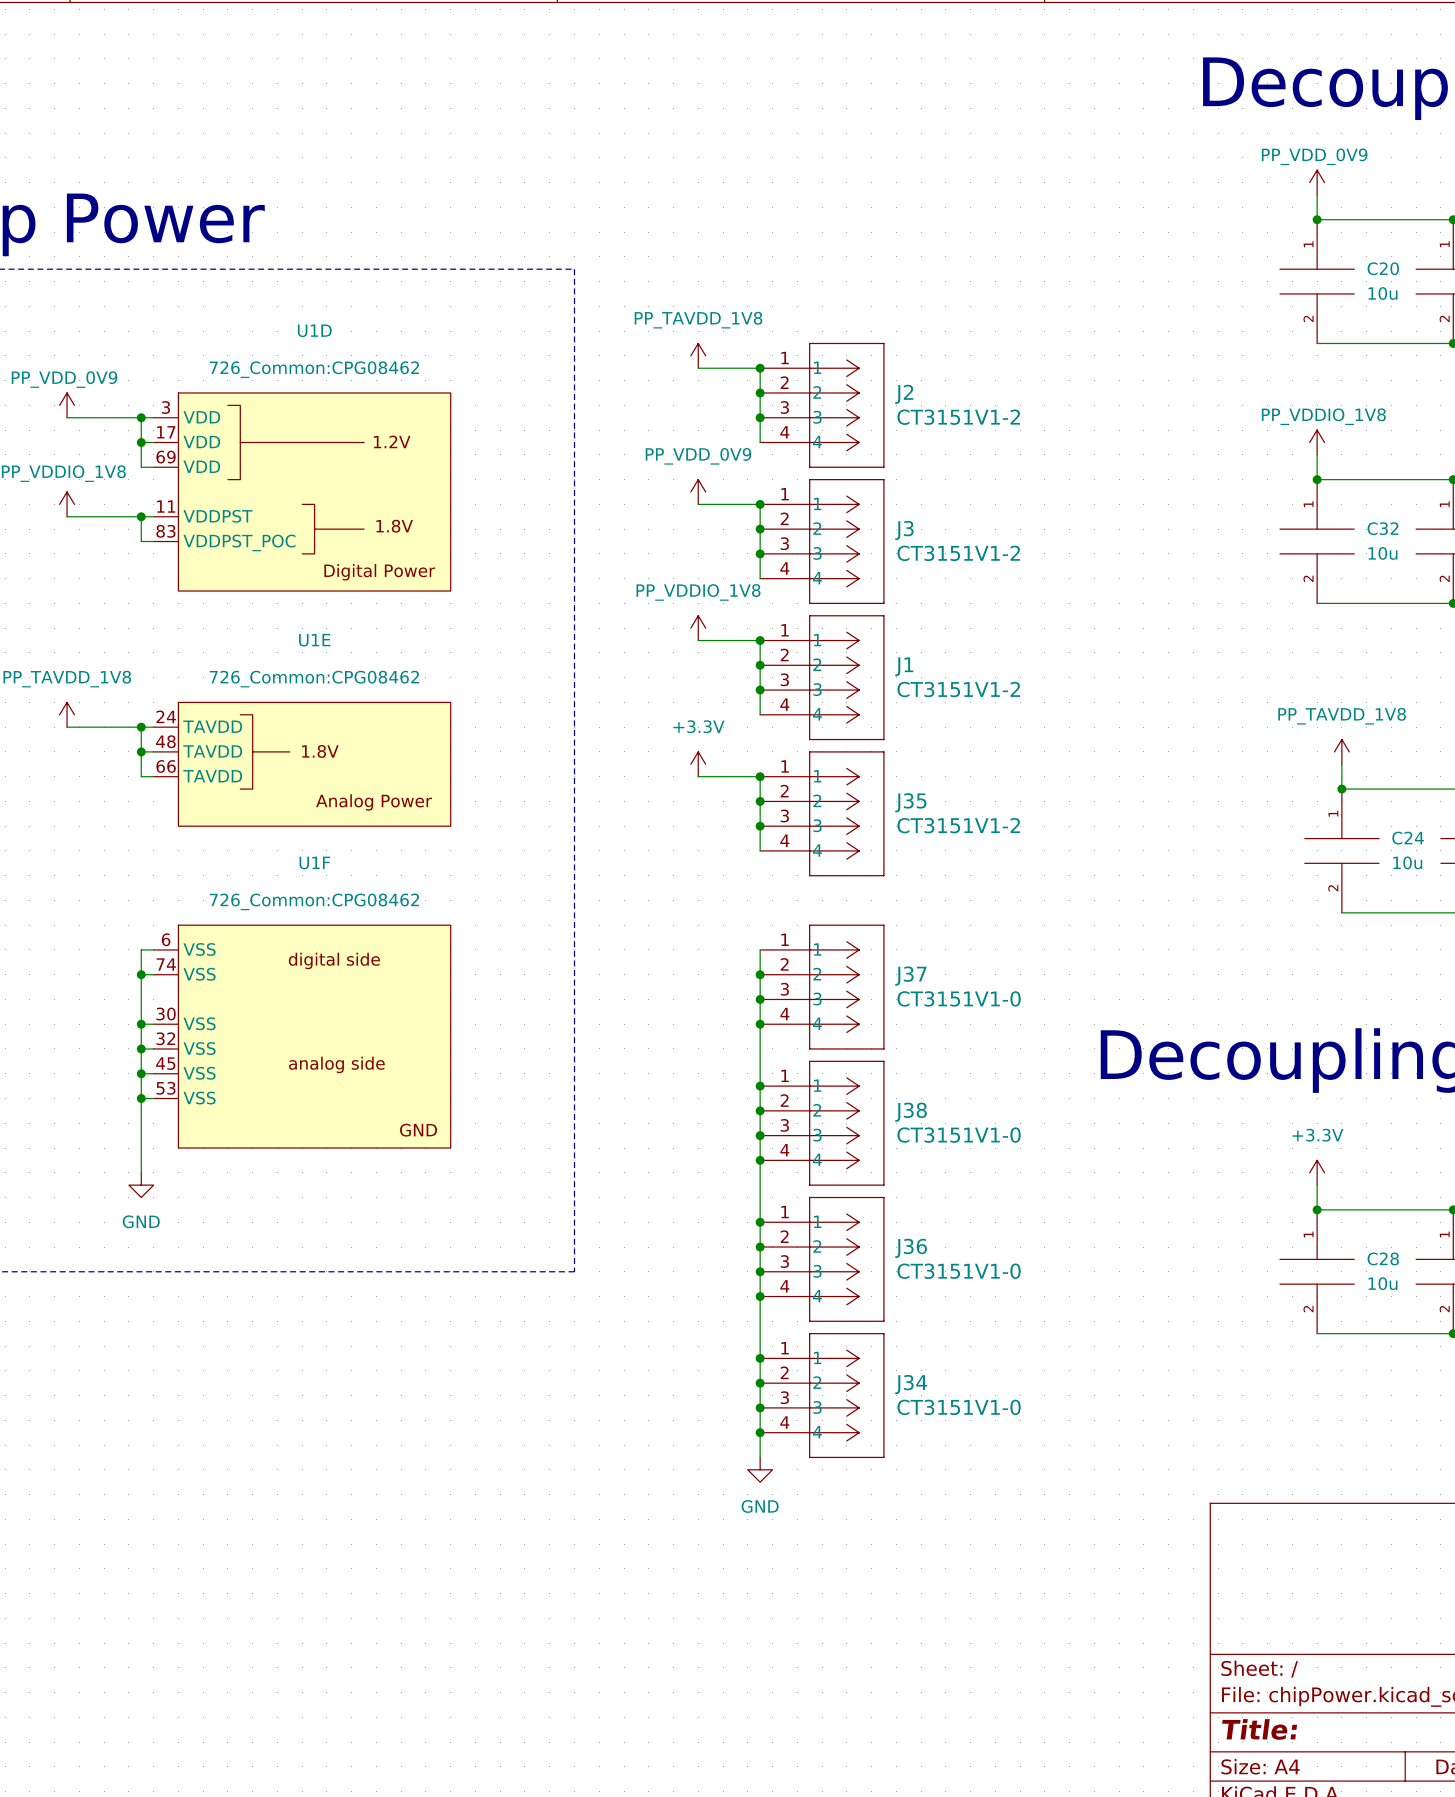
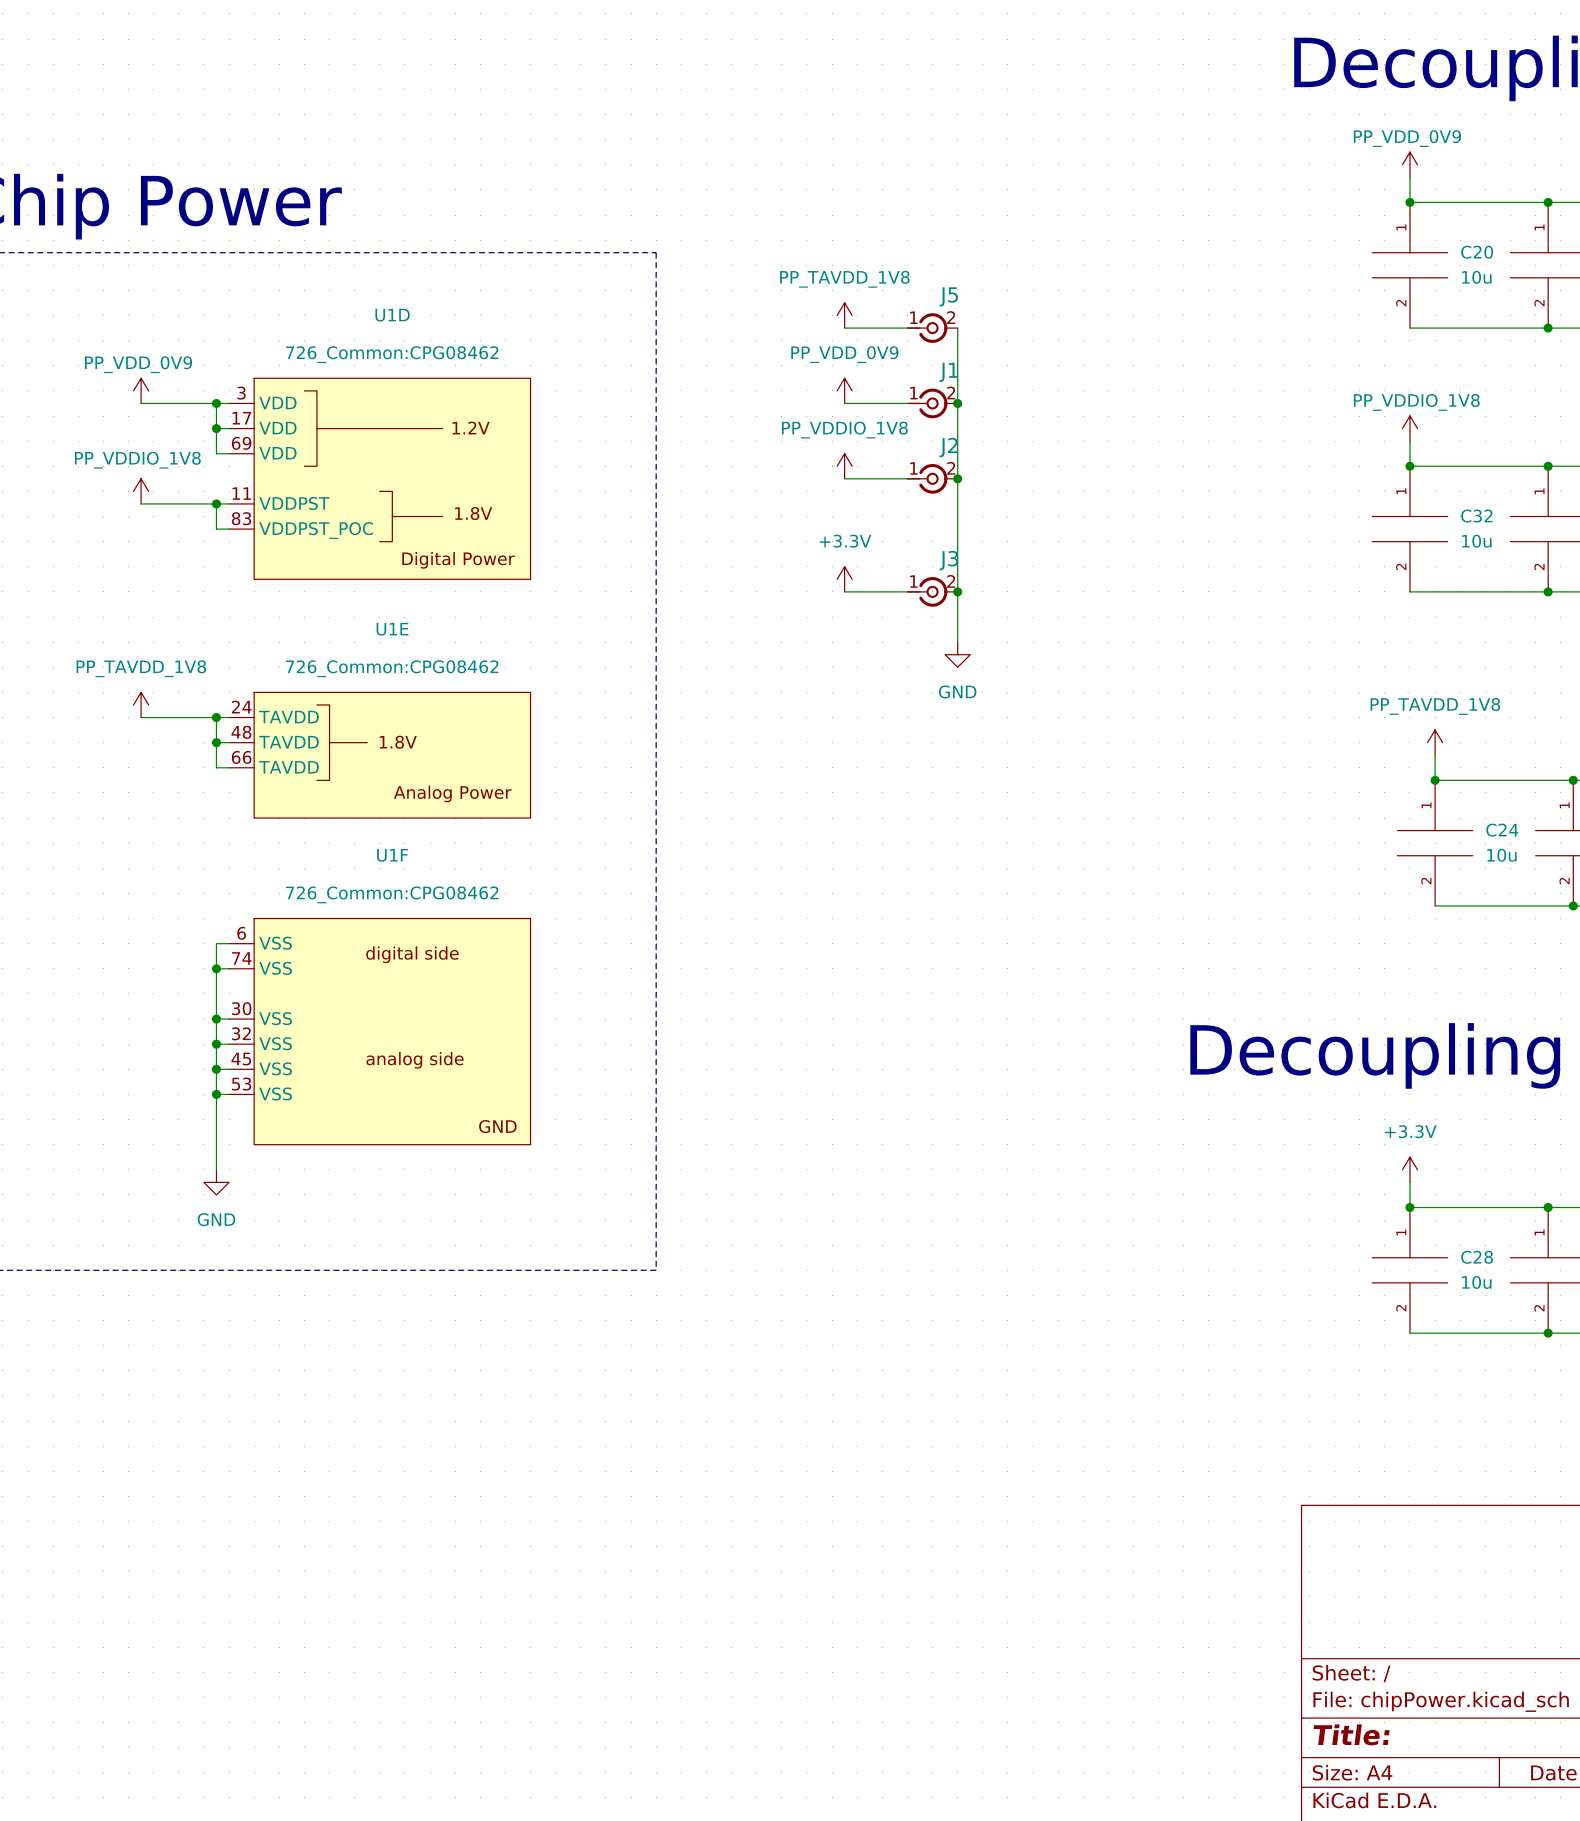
J2 symbol: [760, 342, 885, 468] -> [907, 463, 958, 494]
wire: none -> (844, 328) (907, 328)
J5: none -> (932, 328)
wire: none -> (957, 328) (957, 642)
power symbol position: PP_TAVDD_1V8 (698, 355) -> PP_TAVDD_1V8 (844, 315)
wire: (698, 368) (760, 368) (760, 442) -> none
junction: (760, 368) -> none
junction: (760, 392) -> none
J2 name position: J2 (904, 394) -> J2 (948, 447)
junction: (760, 417) -> none
junction: none -> (957, 403)
J2 value: CT3151V1-2 (958, 417) -> none
J3 symbol: [760, 479, 885, 605] -> [907, 577, 958, 607]
power symbol position: PP_VDD_0V9 (698, 492) -> PP_VDD_0V9 (844, 390)
wire: none -> (844, 478) (907, 478)
junction: none -> (957, 478)
wire: (698, 504) (760, 504) (760, 578) -> none
junction: (760, 504) -> none
junction: (760, 529) -> none
J3 name position: J3 (904, 530) -> J3 (948, 560)
junction: (760, 553) -> none
J3 value: CT3151V1-2 (958, 553) -> none
wire: none -> (844, 591) (907, 591)
junction: none -> (957, 591)
J1 symbol: [760, 615, 885, 741] -> [907, 388, 958, 419]
power symbol position: PP_VDDIO_1V8 (698, 628) -> PP_VDDIO_1V8 (844, 466)
wire: (698, 640) (760, 640) (760, 714) -> none
junction: (760, 640) -> none
junction: (760, 665) -> none
power symbol: none -> GND (957, 654)
J1 name position: J1 (904, 666) -> J1 (948, 372)
J1 value: CT3151V1-2 (958, 689) -> none
junction: (760, 690) -> none
power symbol position: +3.3V (698, 764) -> +3.3V (844, 579)
wire: (698, 776) (760, 776) (760, 850) -> none
junction: (760, 776) -> none
junction: (760, 801) -> none
J35: CT3151V1-2 (822, 813) -> none
junction: (760, 826) -> none
wire: (760, 949) (760, 1457) -> none
junction: (760, 974) -> none
J37: CT3151V1-0 (822, 987) -> none
junction: (760, 999) -> none
junction: (760, 1024) -> none
junction: (760, 1086) -> none
junction: (760, 1110) -> none
J38: CT3151V1-0 (822, 1123) -> none
junction: (760, 1135) -> none
junction: (760, 1160) -> none
junction: (760, 1222) -> none
junction: (760, 1247) -> none
J36: CT3151V1-0 (822, 1259) -> none
junction: (760, 1271) -> none
junction: (760, 1296) -> none
junction: (760, 1358) -> none
junction: (760, 1383) -> none
J34: CT3151V1-0 (822, 1395) -> none
junction: (760, 1407) -> none
junction: (760, 1432) -> none
power symbol: GND (760, 1469) -> none

